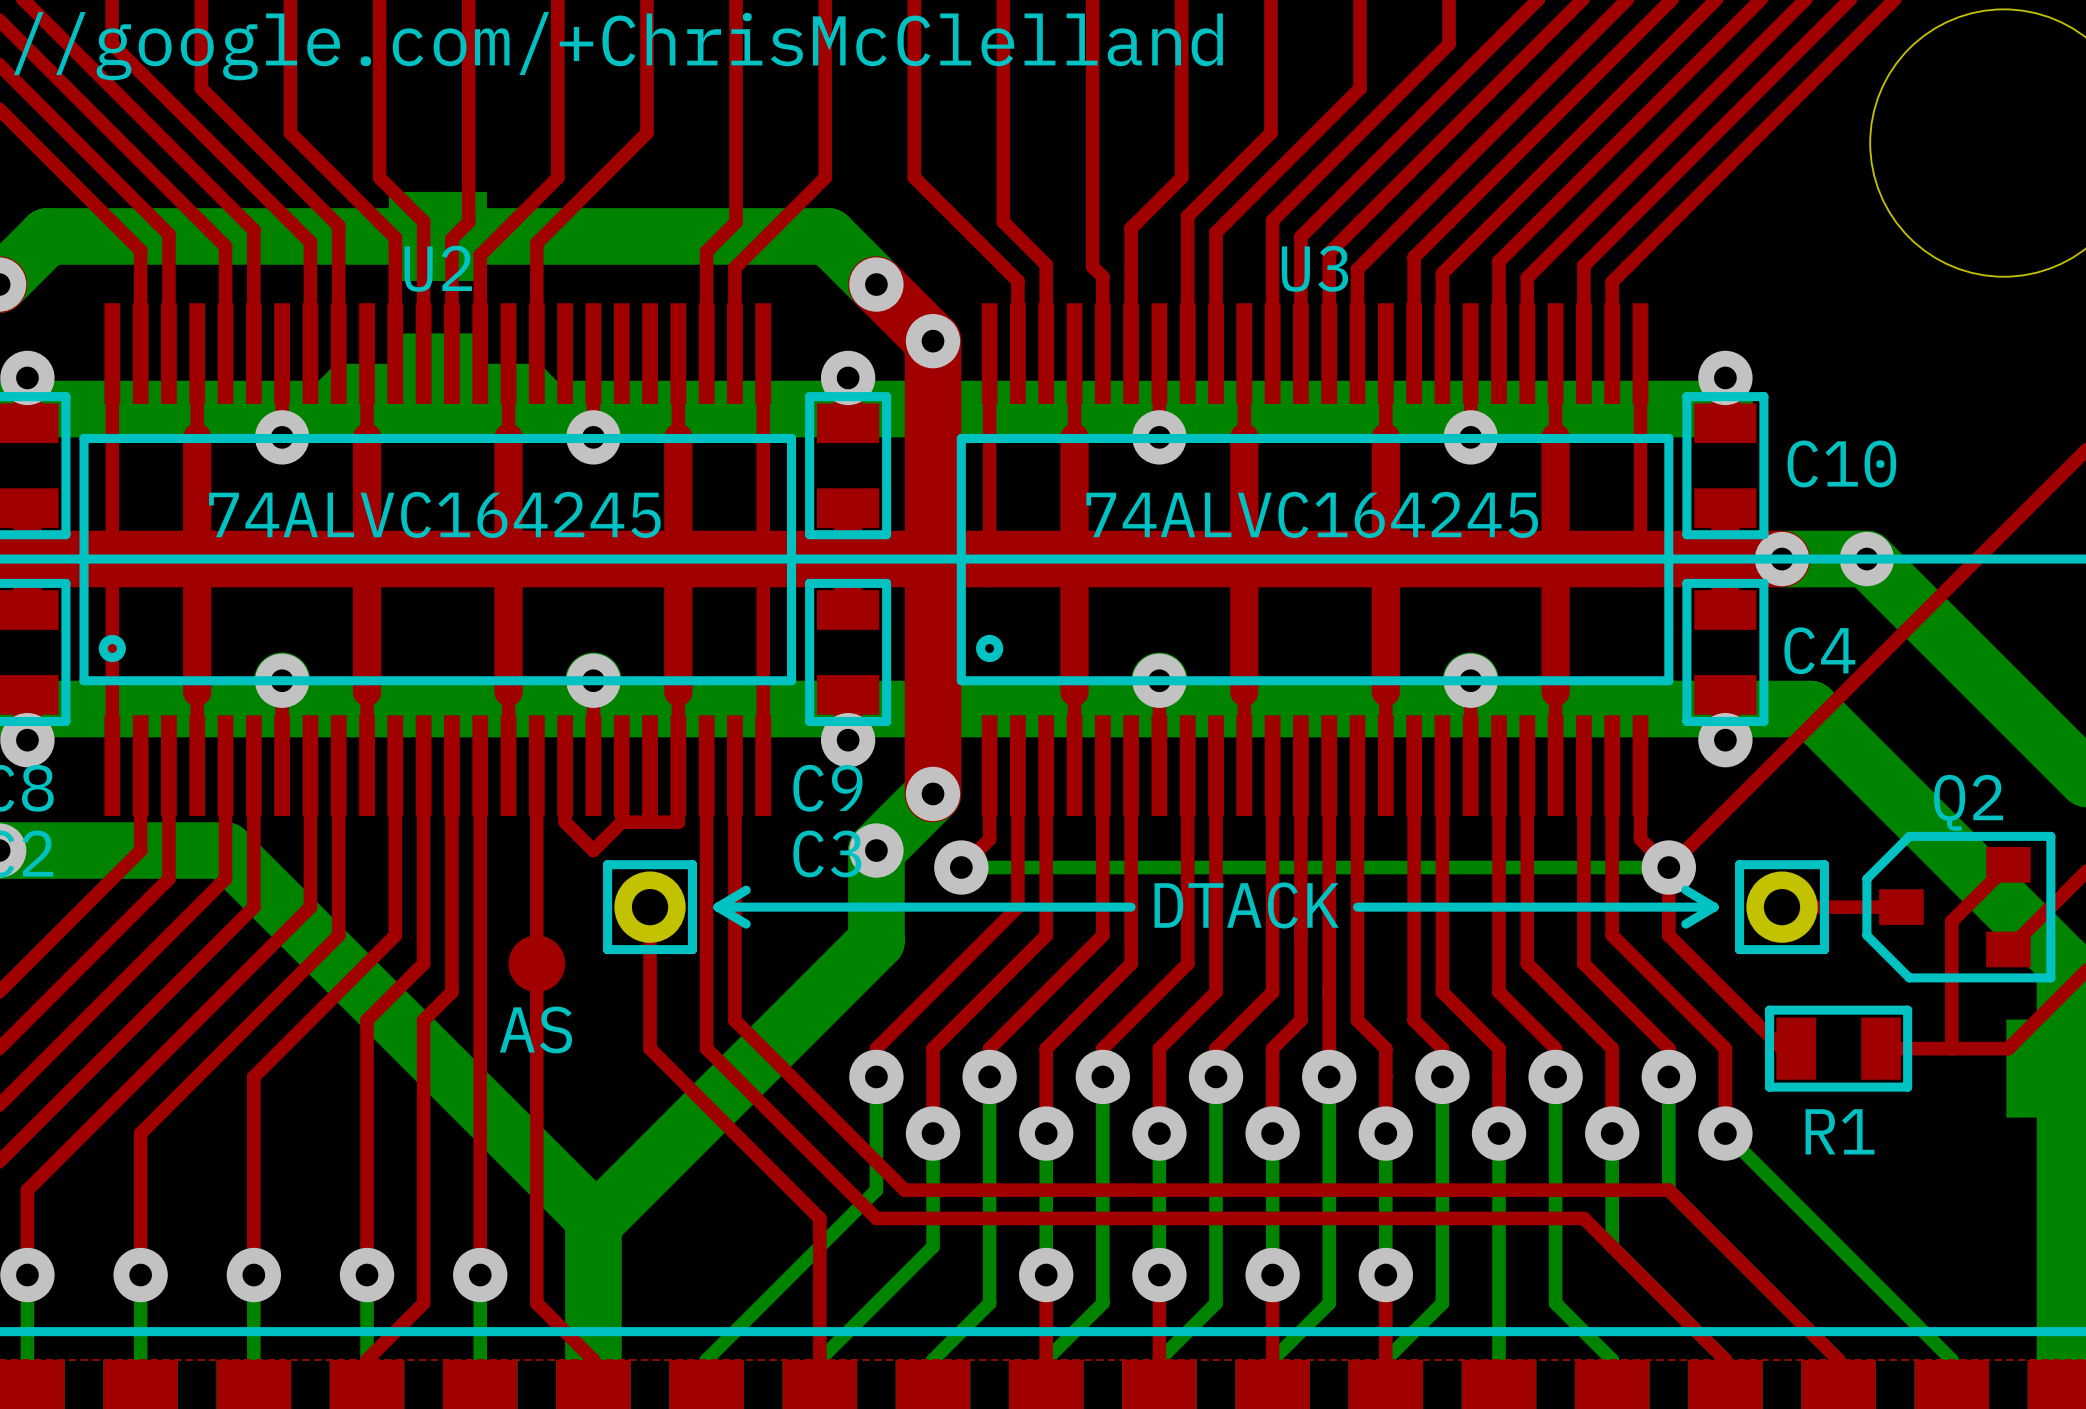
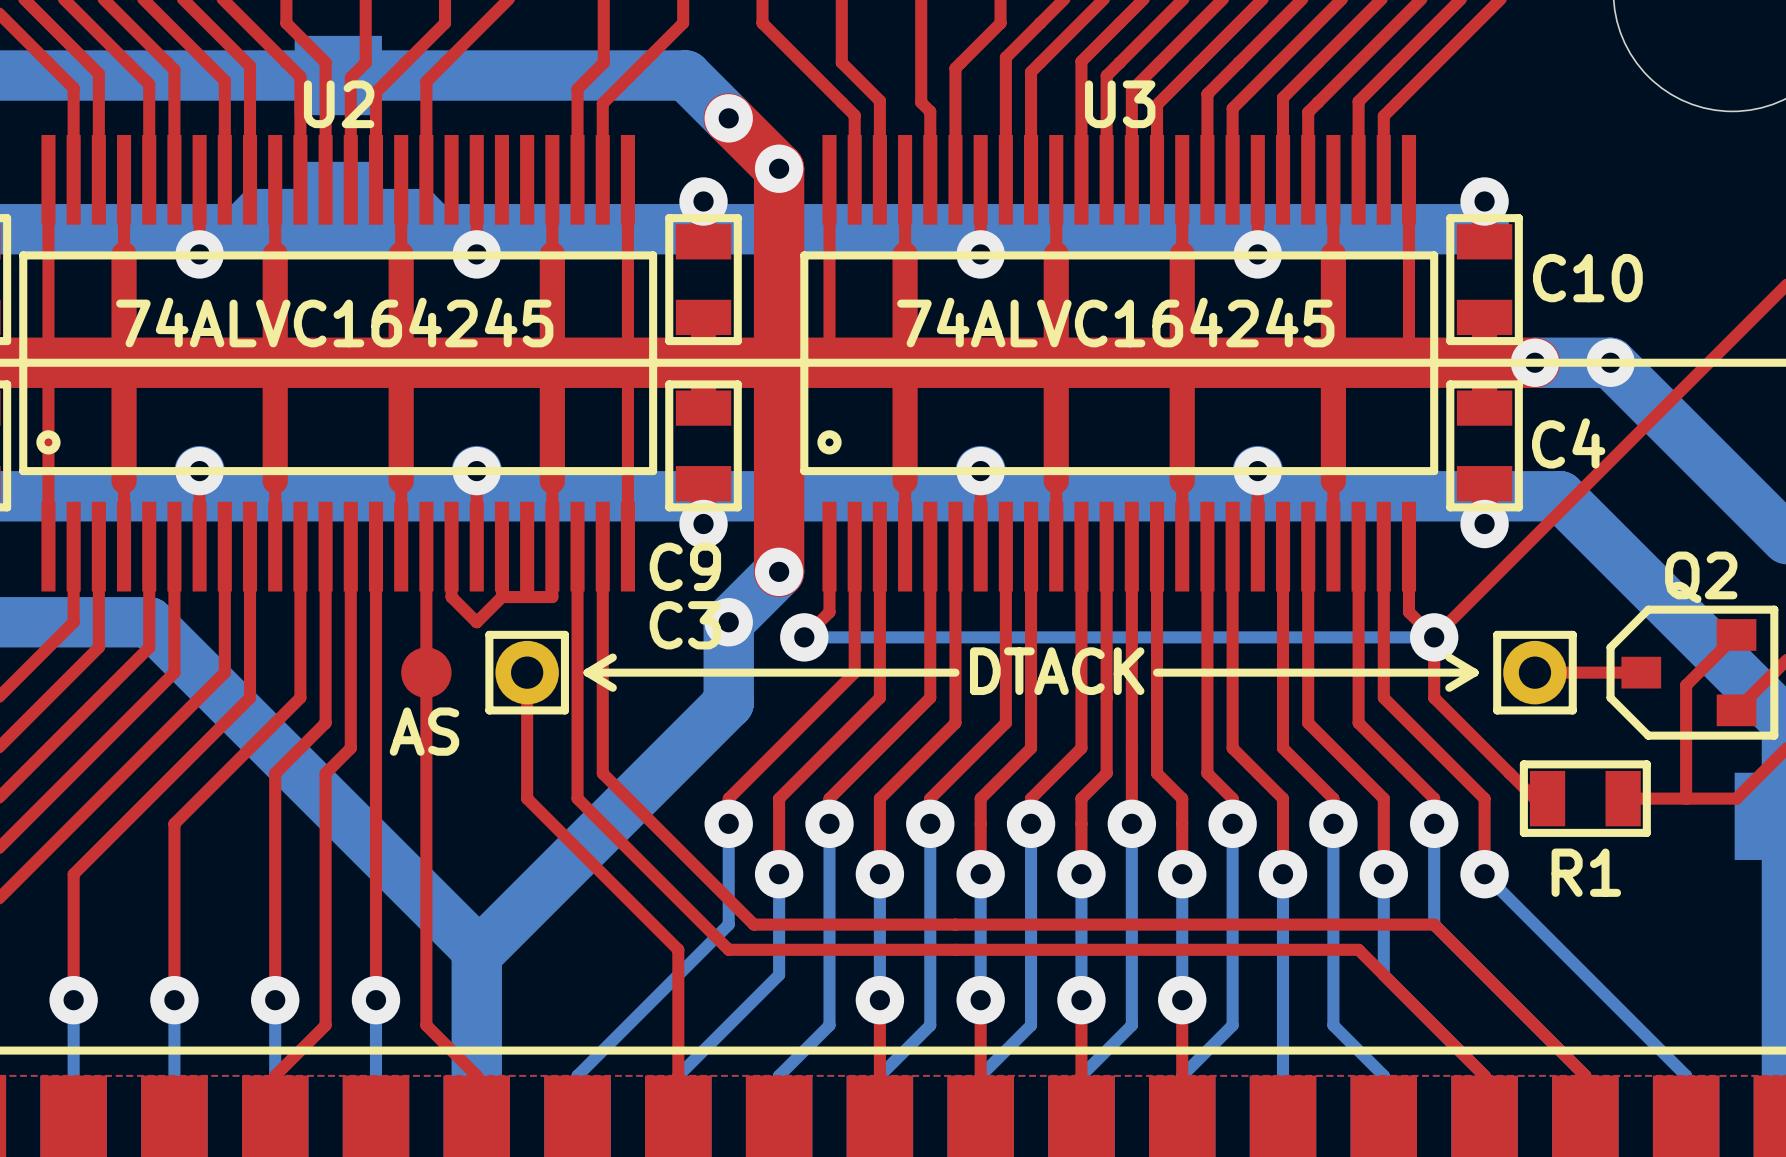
part position: (536, 963) -> (426, 672)

